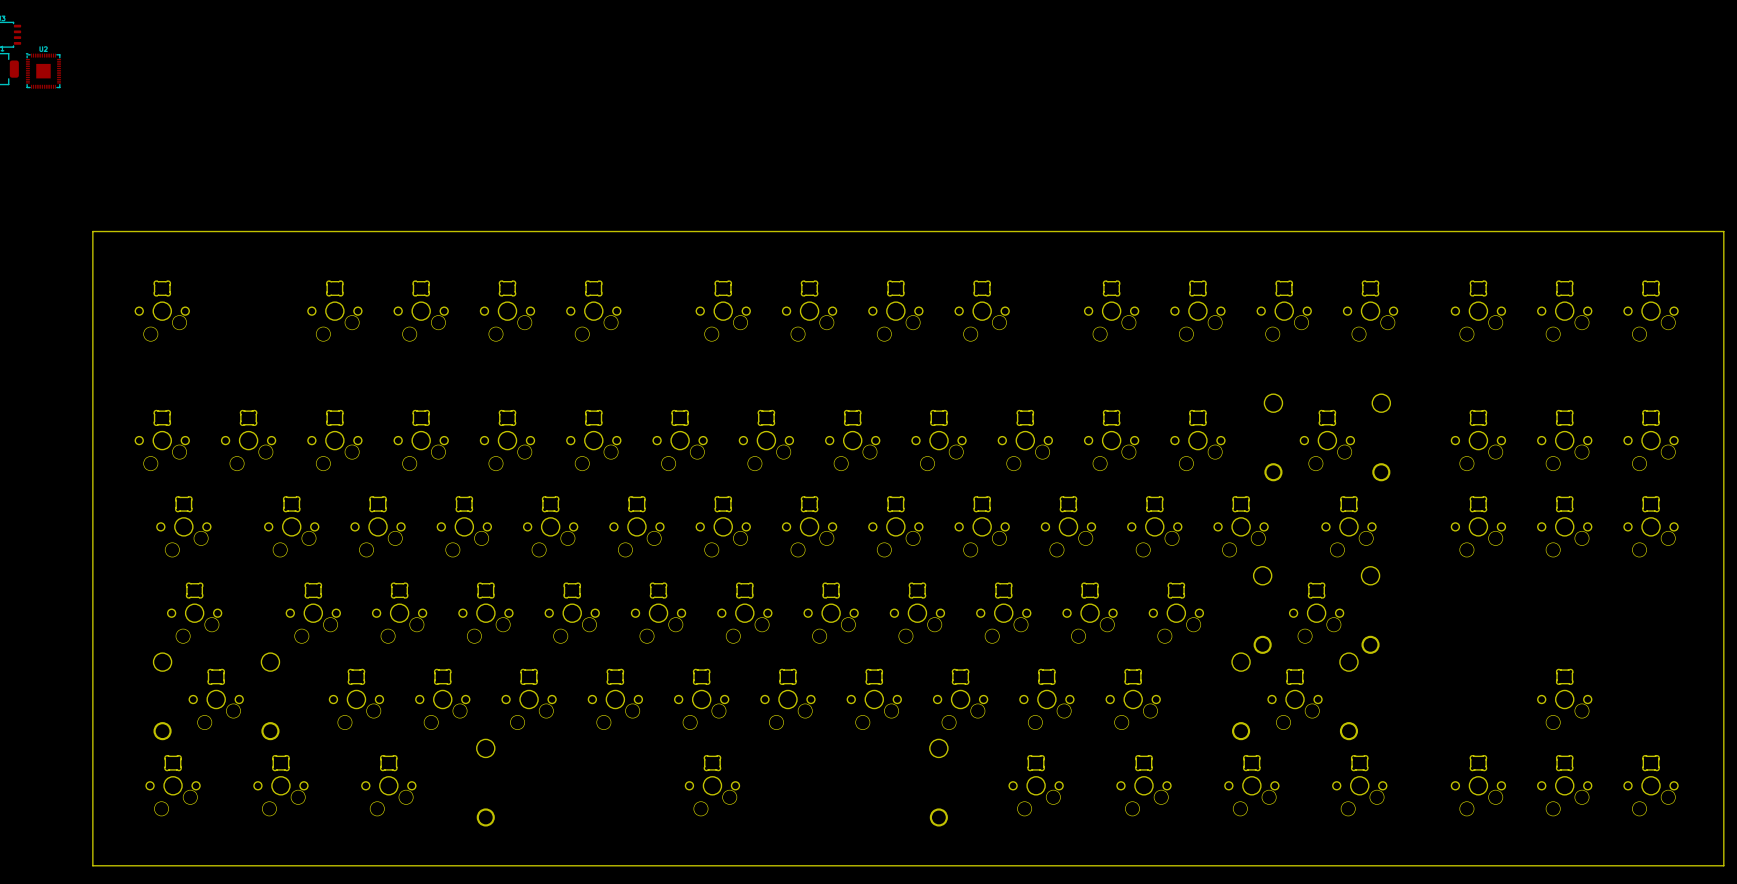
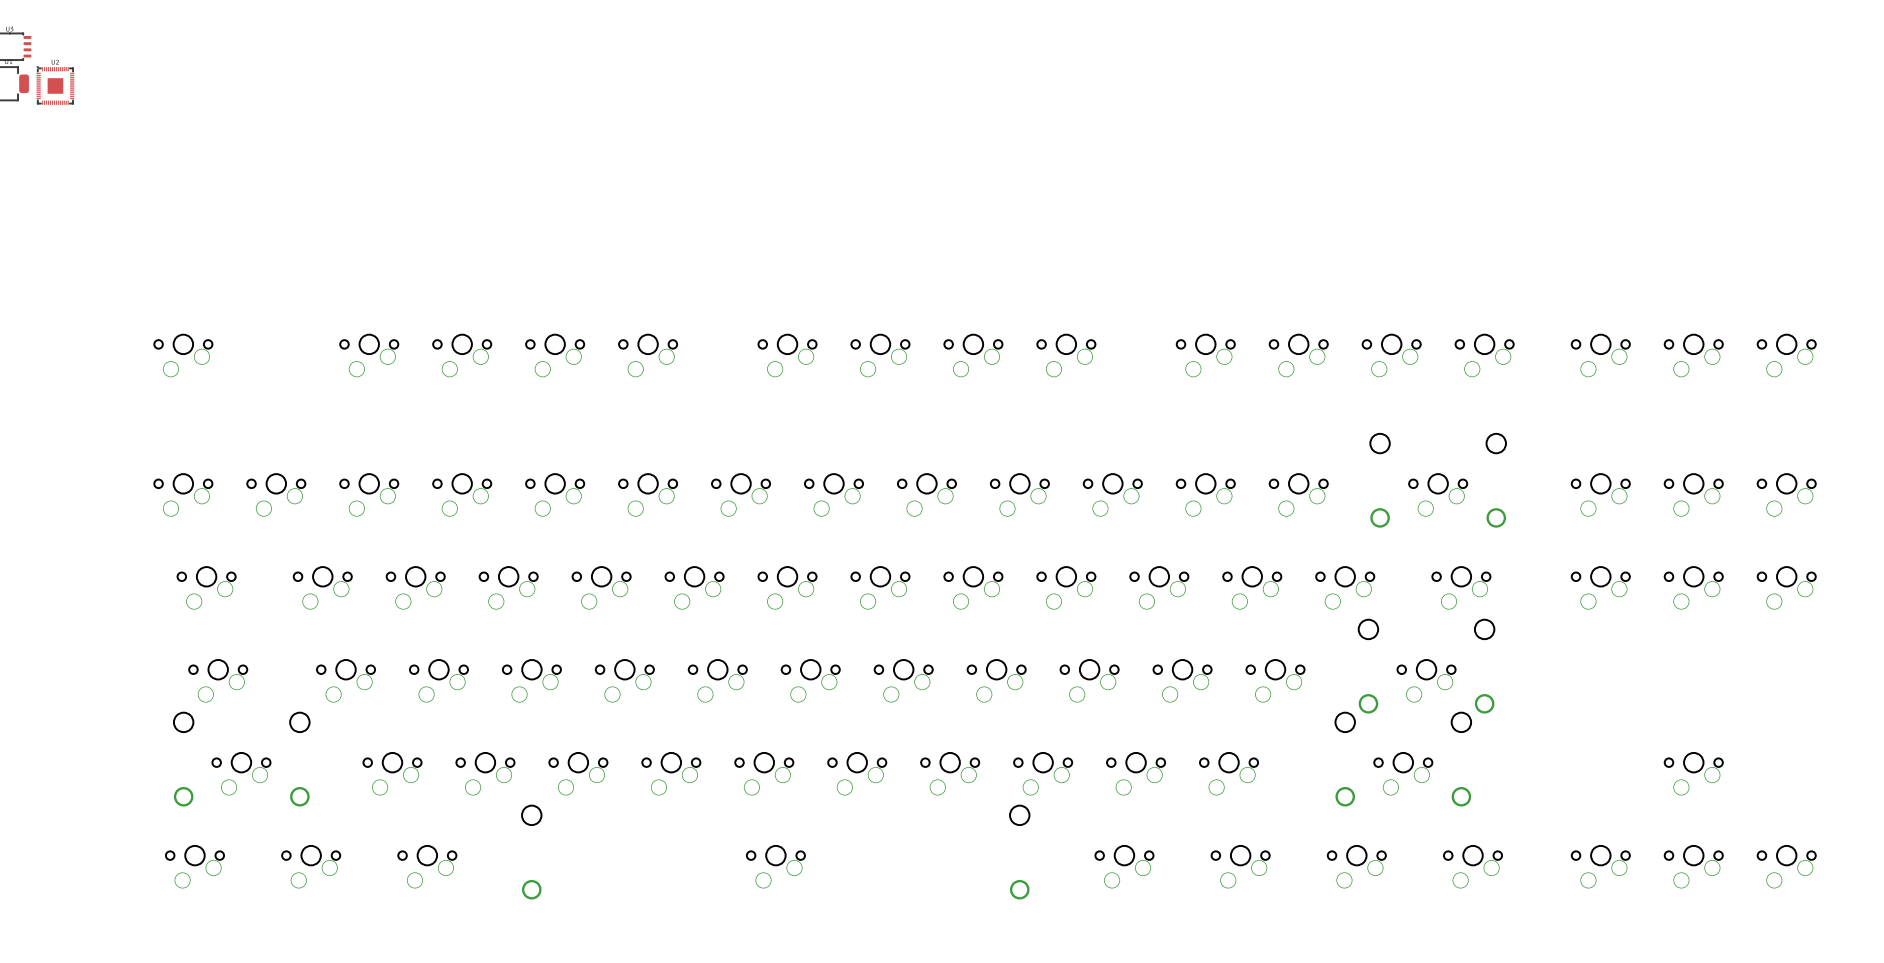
board edge: (92, 231) (1723, 231) (1723, 865) (92, 865) (92, 231) -> none
part: (162, 288) -> none
part: (334, 288) -> none
part: (421, 288) -> none
part: (507, 288) -> none
part: (593, 288) -> none
part: (723, 288) -> none
part: (809, 288) -> none
part: (895, 288) -> none
part: (982, 288) -> none
part: (1111, 288) -> none
part: (1197, 288) -> none
part: (1284, 288) -> none
part: (1370, 288) -> none
part: (1478, 288) -> none
part: (1564, 288) -> none
part: (1651, 288) -> none
part: (162, 417) -> none
part: (248, 417) -> none
part: (334, 417) -> none
part: (421, 417) -> none
part: (507, 417) -> none
part: (593, 417) -> none
part: (680, 417) -> none
part: (766, 417) -> none
part: (852, 417) -> none
part: (939, 417) -> none
part: (1025, 417) -> none
part: (1111, 417) -> none
part: (1197, 417) -> none
part: (1327, 417) -> none
part: (1478, 417) -> none
part: (1564, 417) -> none
part: (1651, 417) -> none
part: (183, 504) -> none
part: (291, 504) -> none
part: (378, 504) -> none
part: (464, 504) -> none
part: (550, 504) -> none
part: (636, 504) -> none
part: (723, 504) -> none
part: (809, 504) -> none
part: (895, 504) -> none
part: (982, 504) -> none
part: (1068, 504) -> none
part: (1154, 504) -> none
part: (1241, 504) -> none
part: (1348, 504) -> none
part: (1478, 504) -> none
part: (1564, 504) -> none
part: (1651, 504) -> none
part: (194, 590) -> none
part: (313, 590) -> none
part: (399, 590) -> none
part: (485, 590) -> none
part: (572, 590) -> none
part: (658, 590) -> none
part: (744, 590) -> none
part: (831, 590) -> none
part: (917, 590) -> none
part: (1003, 590) -> none
part: (1090, 590) -> none
part: (1176, 590) -> none
part: (1316, 590) -> none
part: (216, 676) -> none
part: (356, 676) -> none
part: (442, 676) -> none
part: (529, 676) -> none
part: (615, 676) -> none
part: (701, 676) -> none
part: (787, 676) -> none
part: (874, 676) -> none
part: (960, 676) -> none
part: (1046, 676) -> none
part: (1133, 676) -> none
part: (1295, 676) -> none
part: (1564, 676) -> none
part: (173, 763) -> none
part: (280, 763) -> none
part: (388, 763) -> none
part: (712, 763) -> none
part: (1036, 763) -> none
part: (1143, 763) -> none
part: (1251, 763) -> none
part: (1359, 763) -> none
part: (1478, 763) -> none
part: (1564, 763) -> none
part: (1651, 763) -> none

